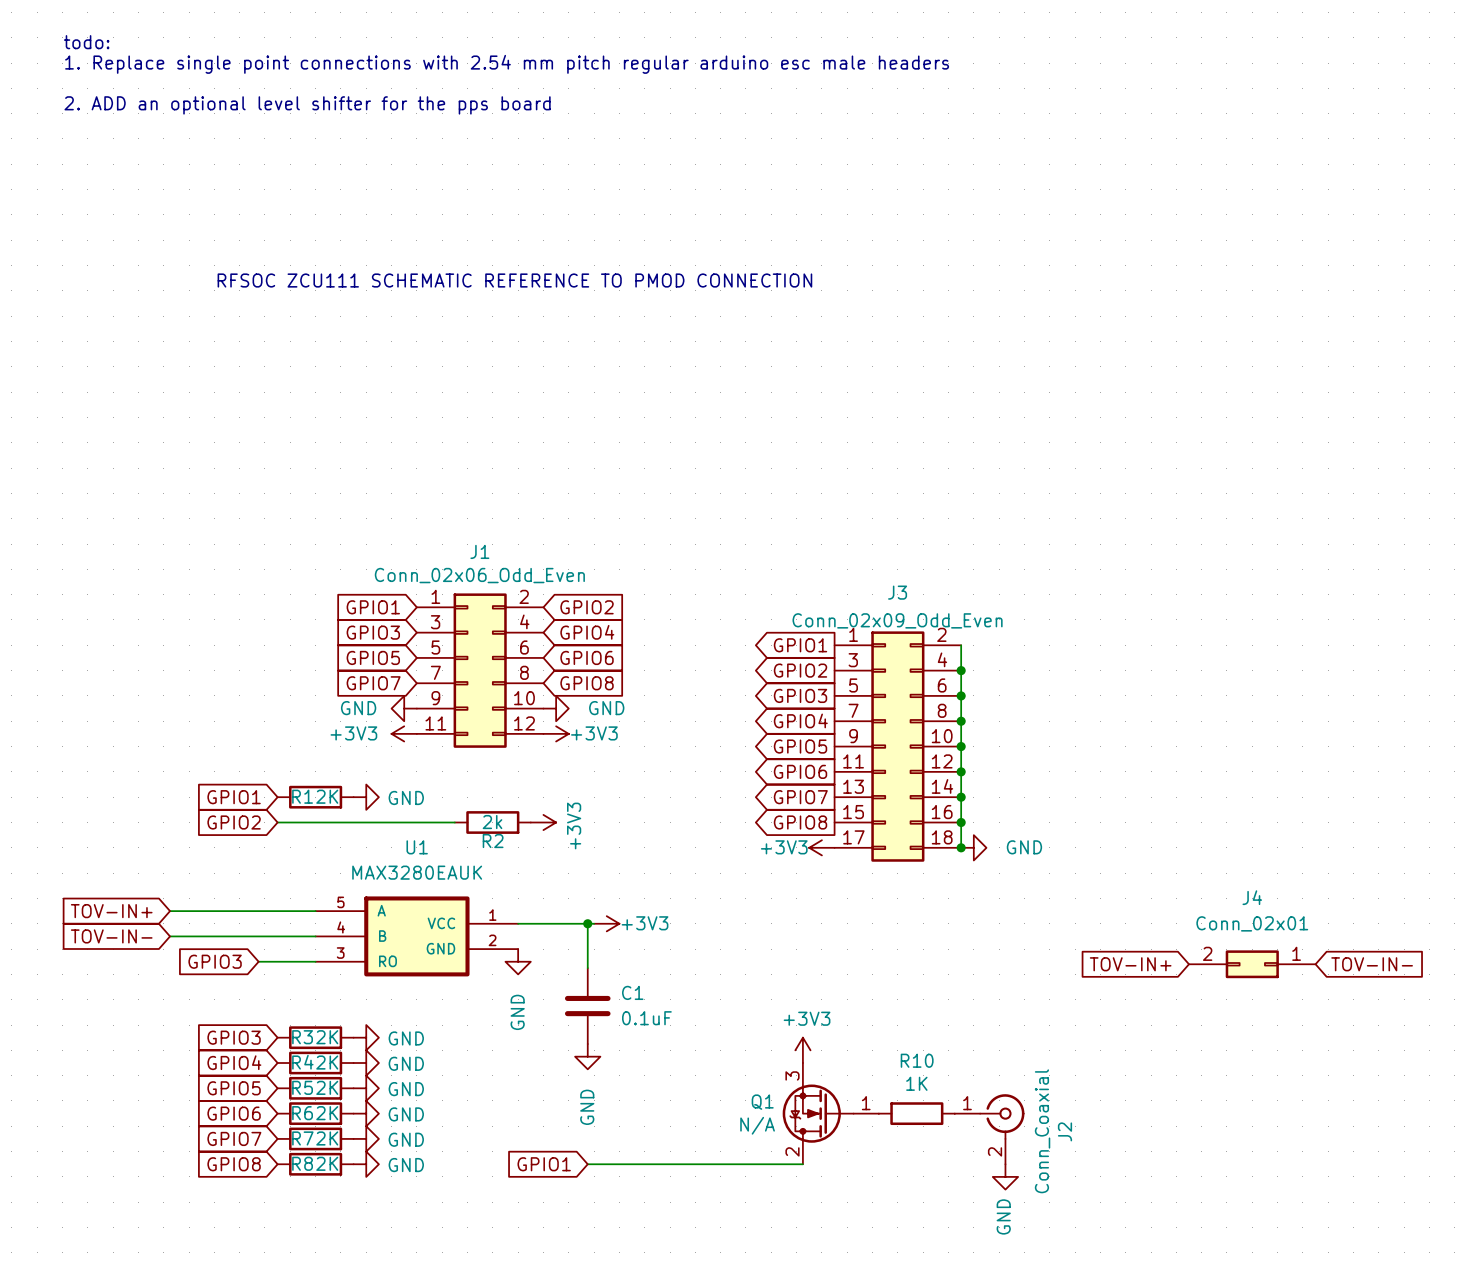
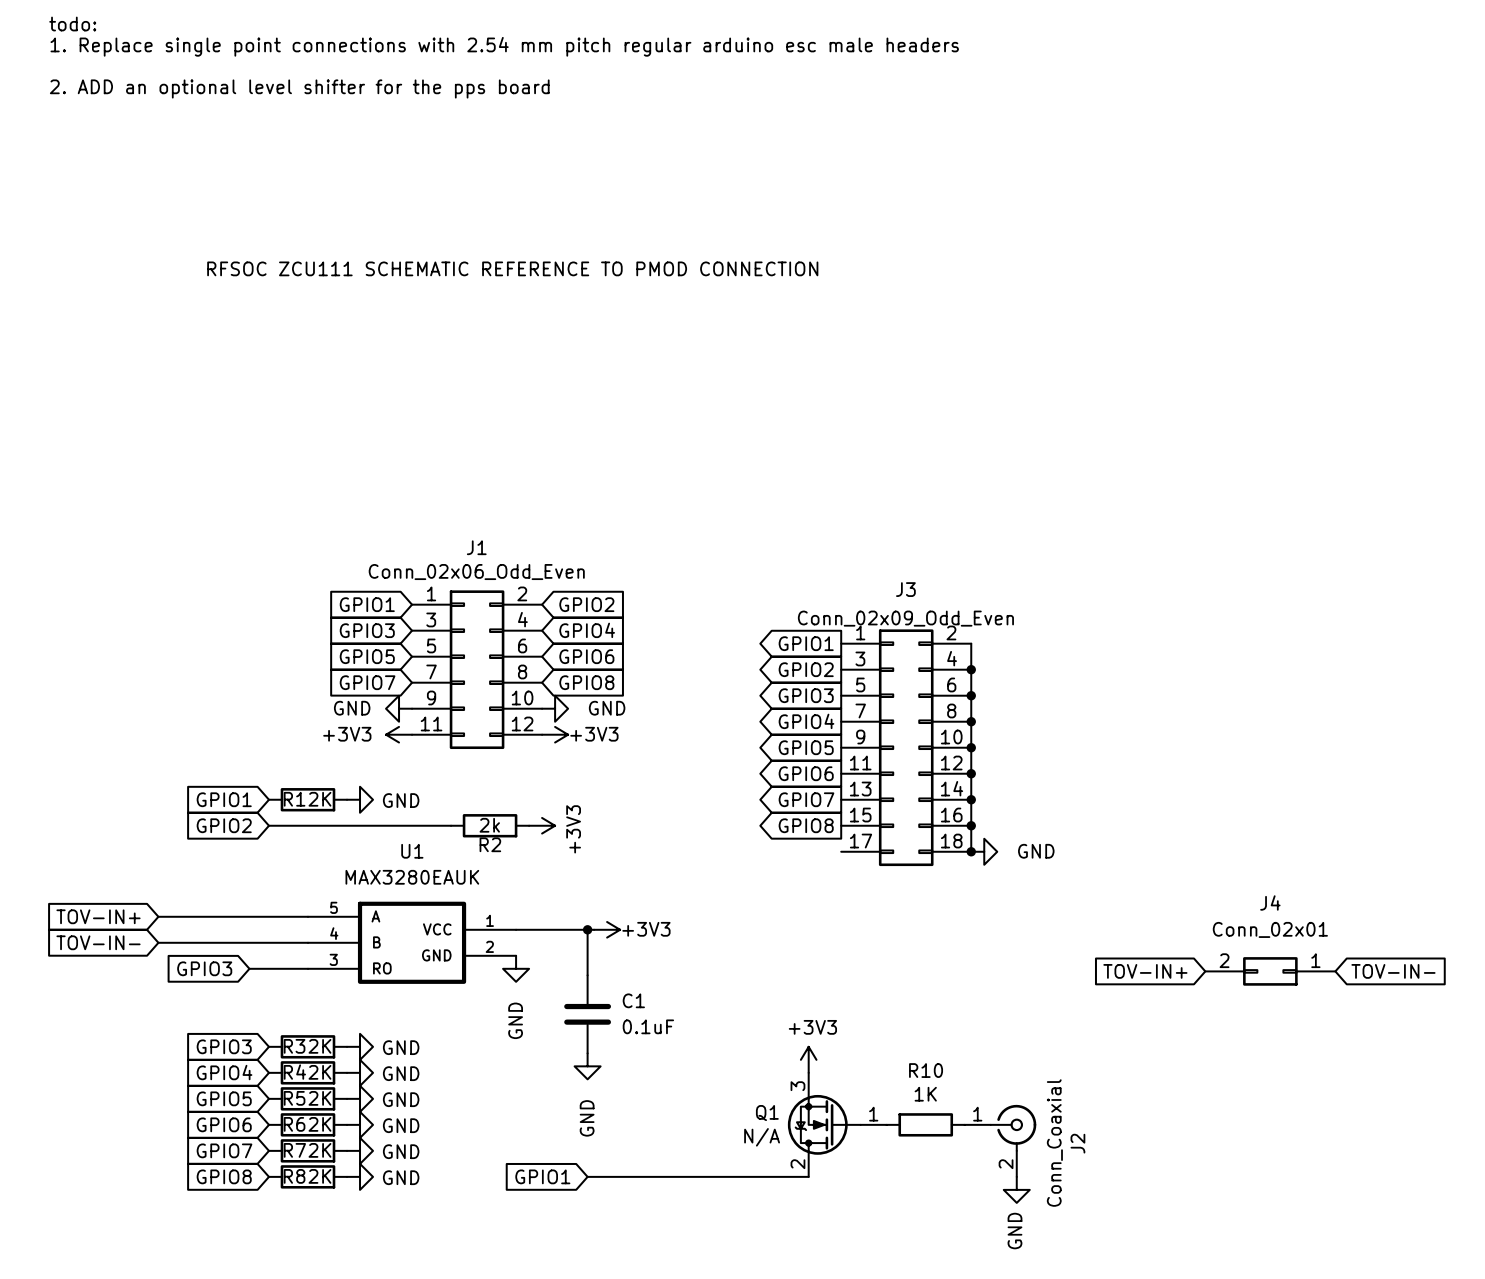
power symbol: +3V3 (821, 847) -> none

